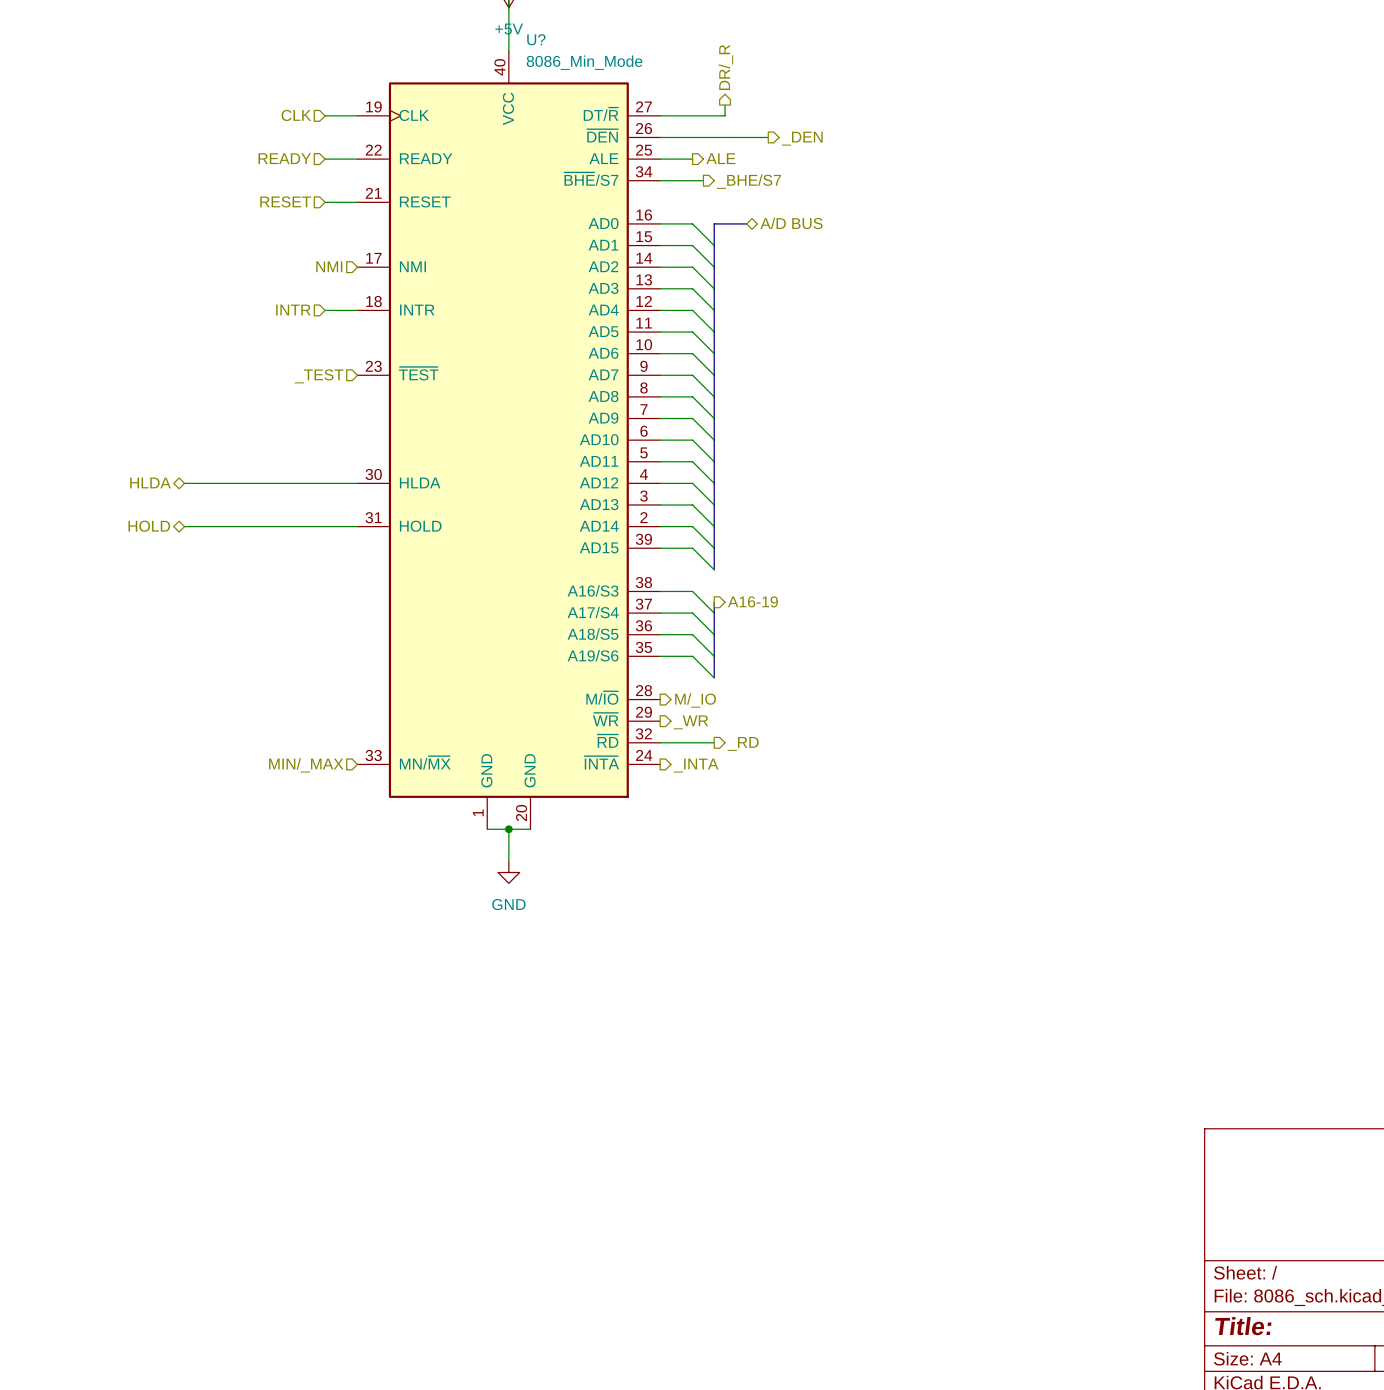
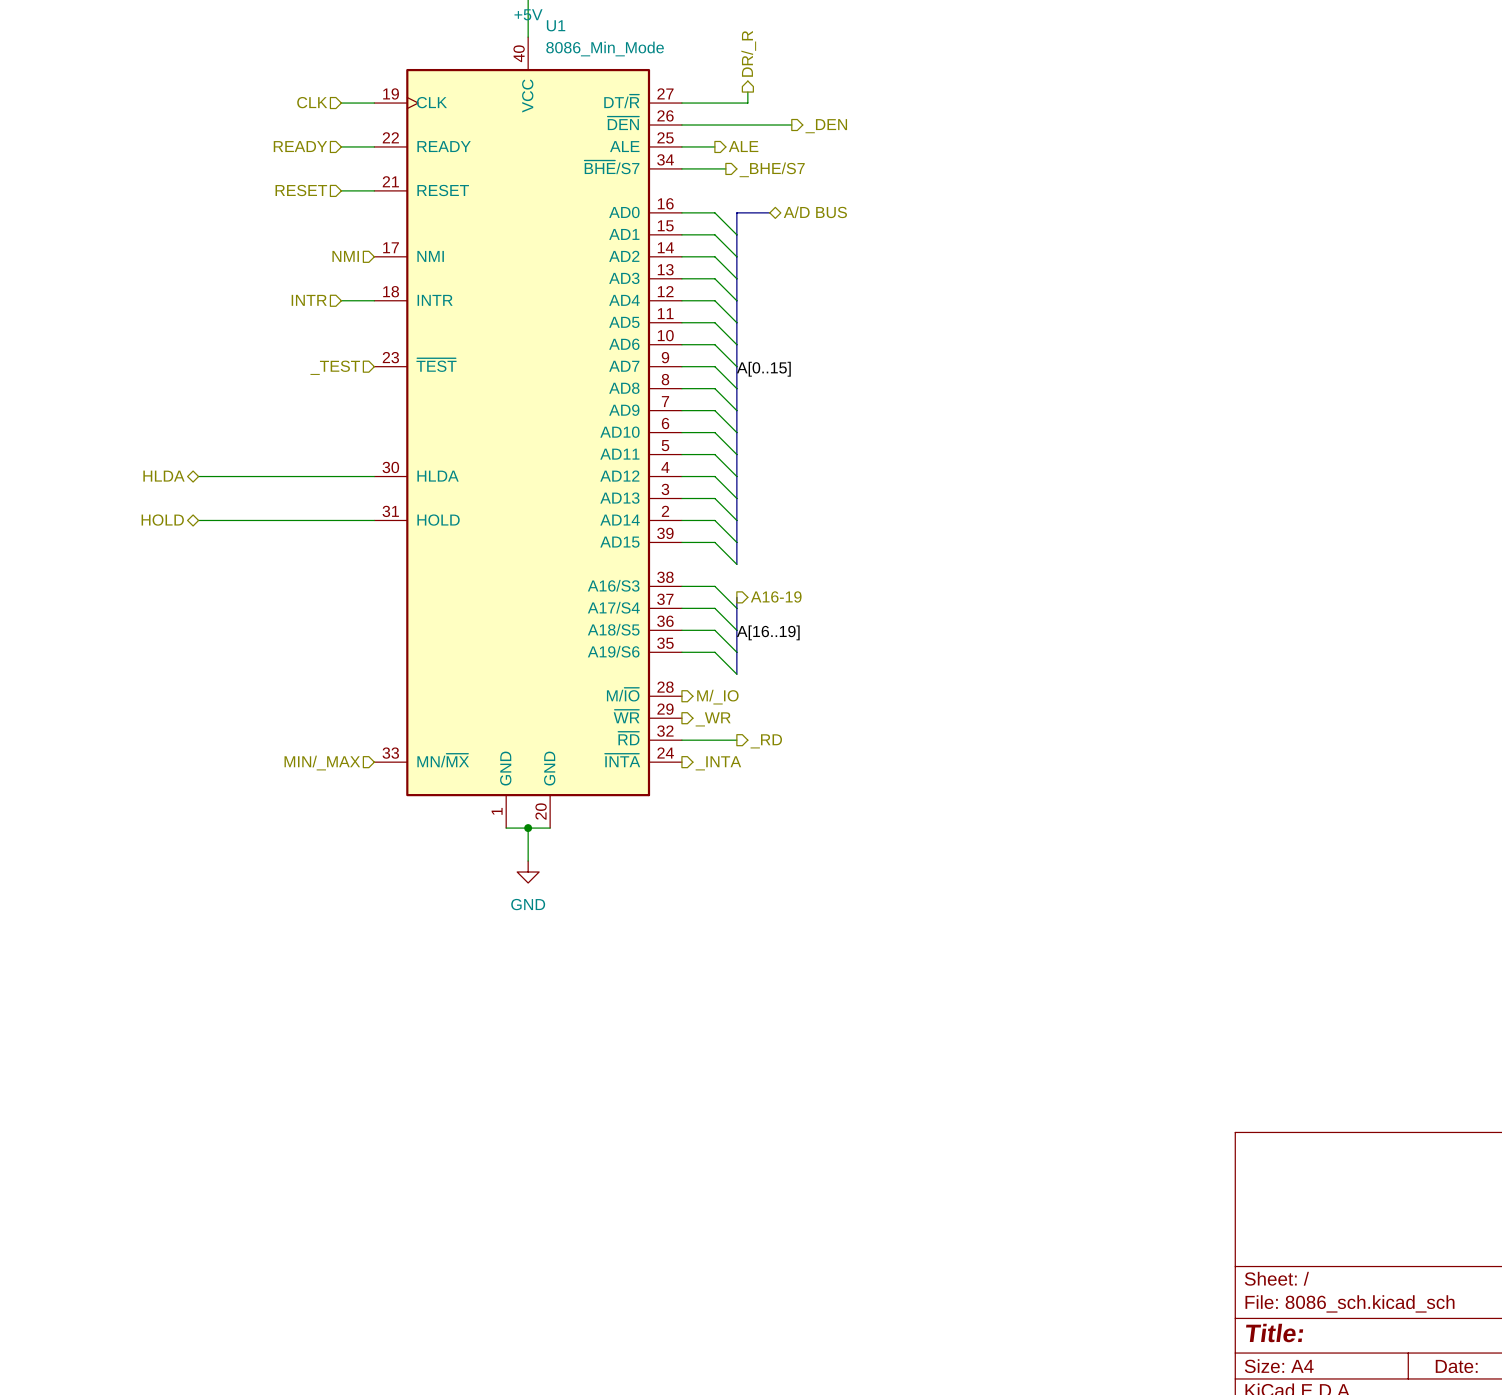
U? name: U? (536, 39) -> U1 (556, 25)
label: none -> A[0..15] (763, 369)
label: none -> A[16..19] (768, 632)

